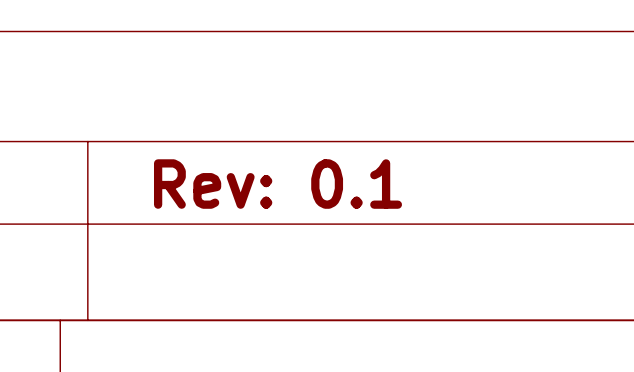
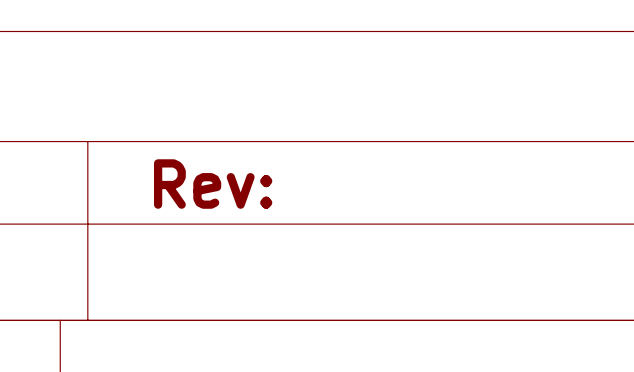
title block: Rev: 0.1 (278, 184) -> Rev: (213, 184)

